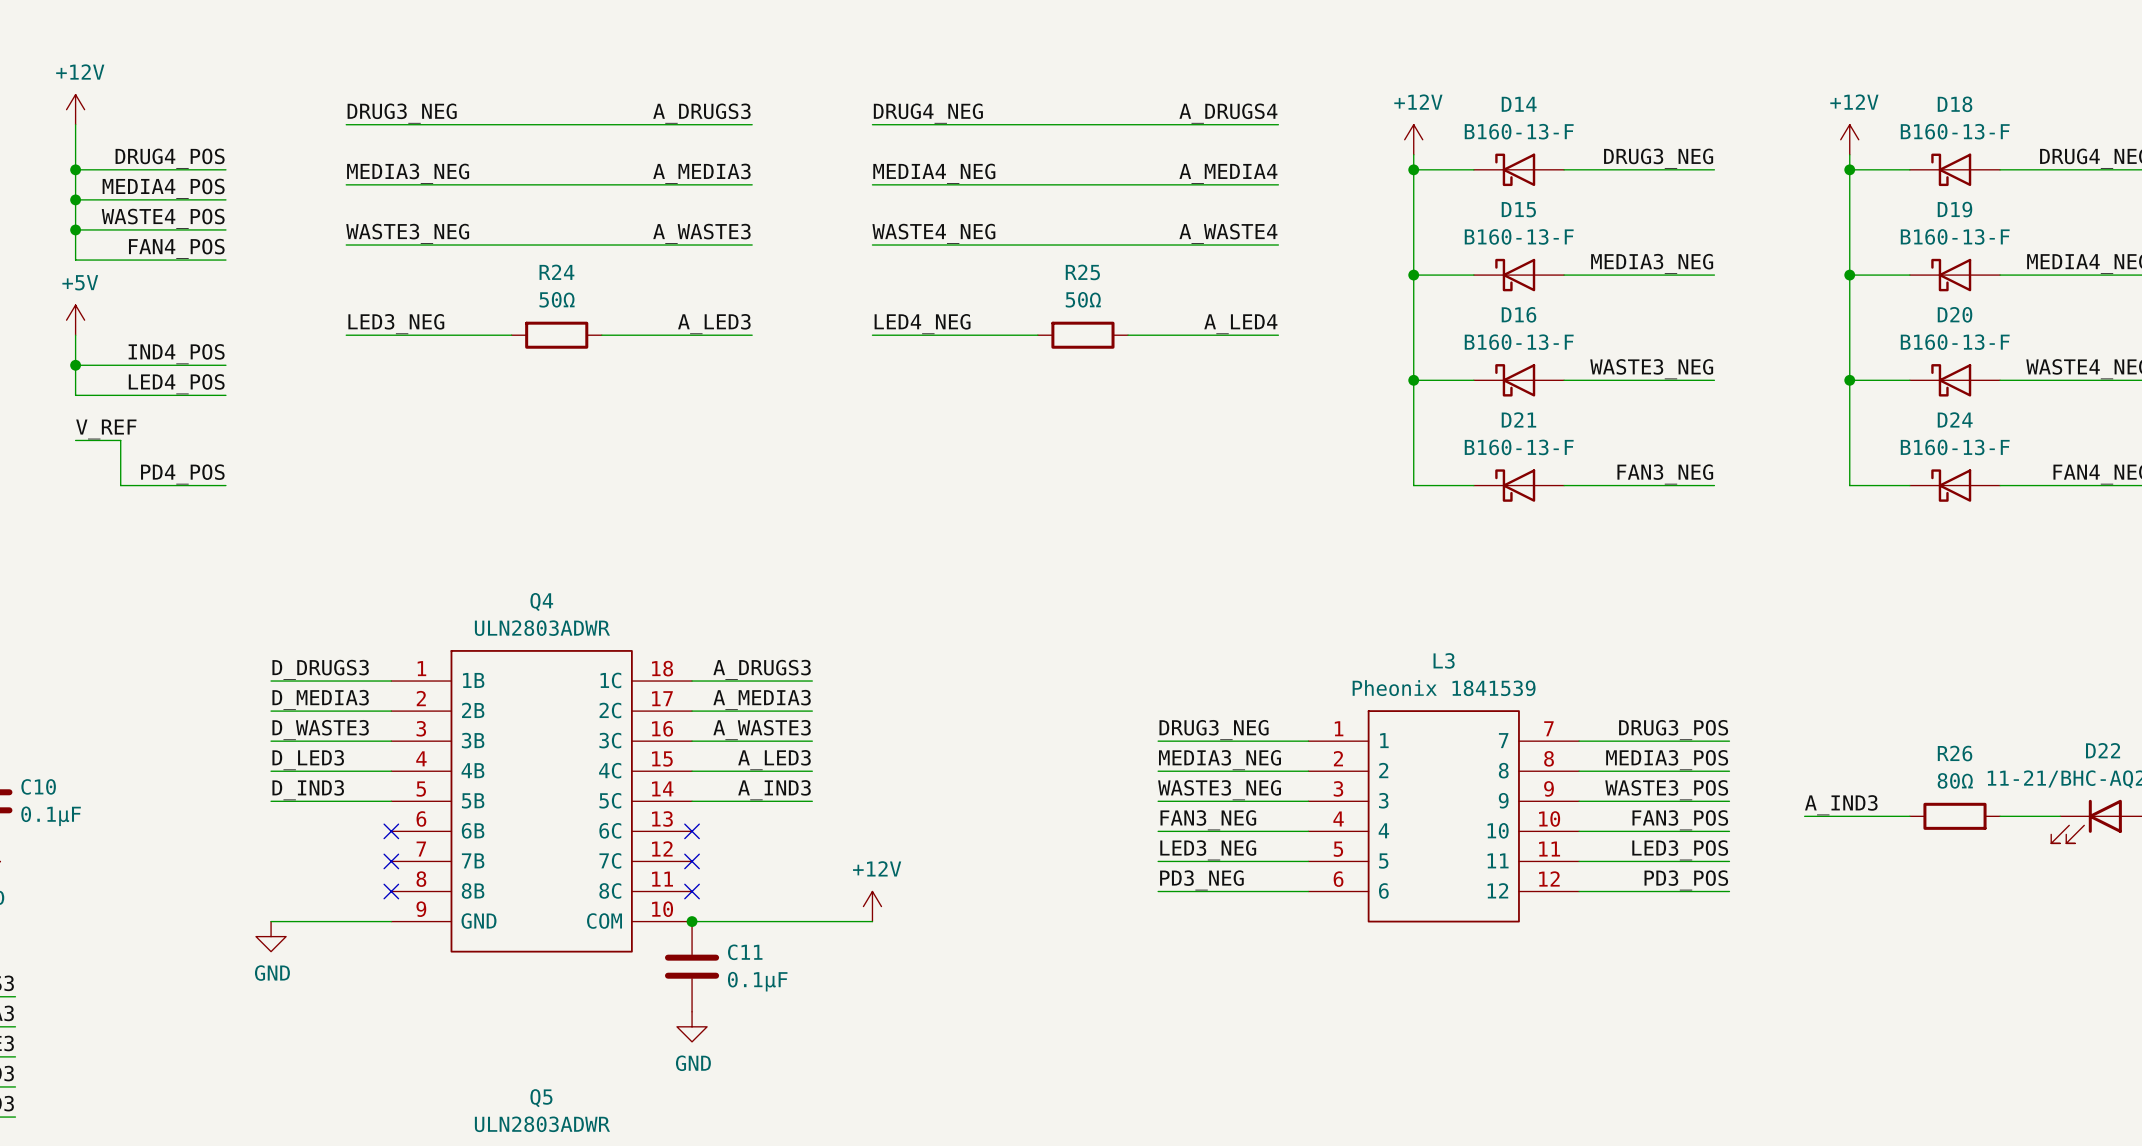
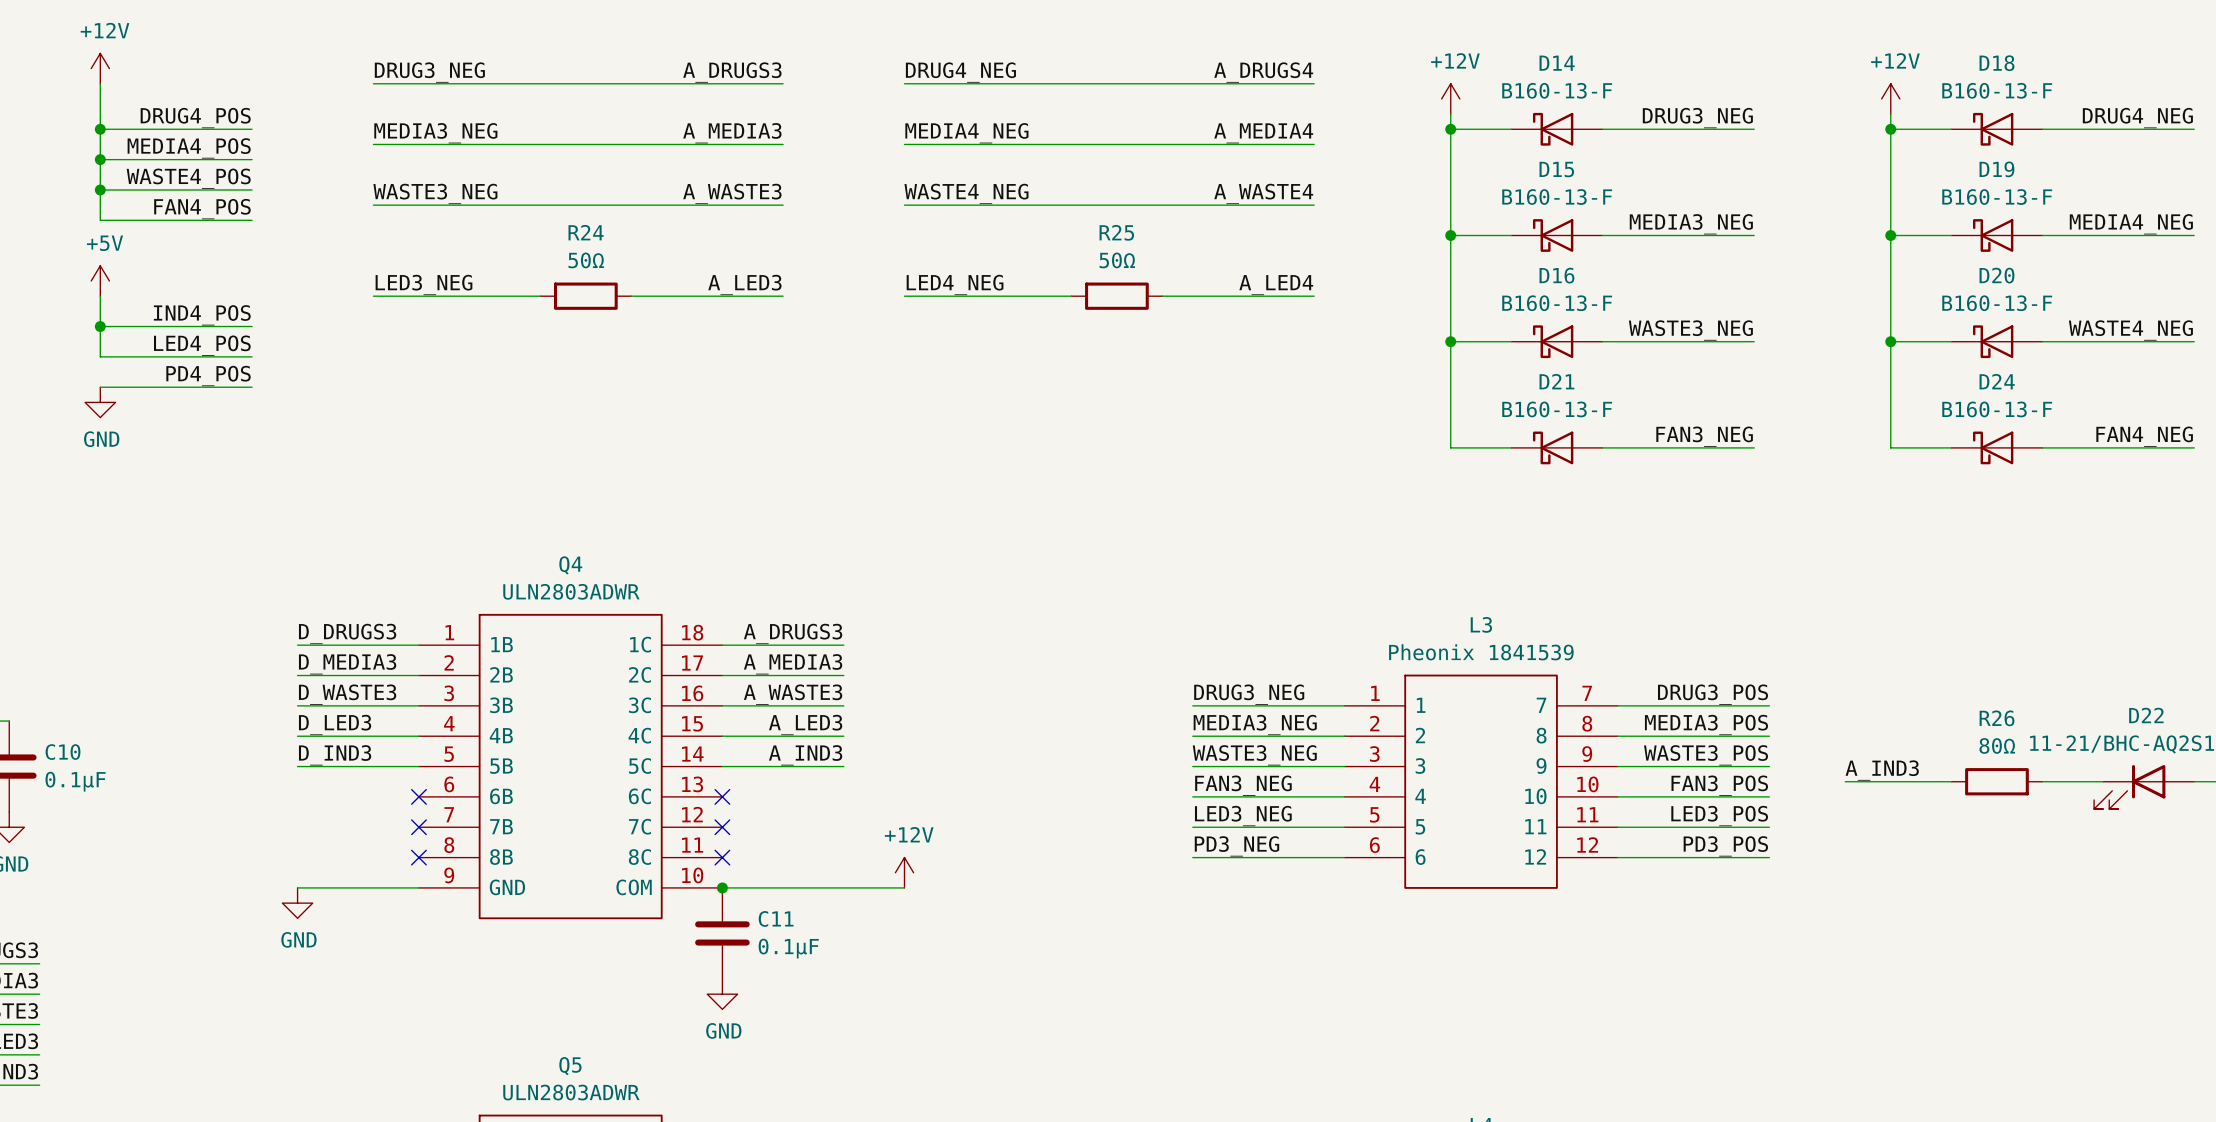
wire: none -> (100, 387) (252, 387)
label: V_REF (106, 429) -> none
wire: (75, 440) (120, 440) (120, 485) (225, 485) -> none
power symbol: none -> GND (100, 402)
label position: PD4_POS (182, 474) -> PD4_POS (208, 376)

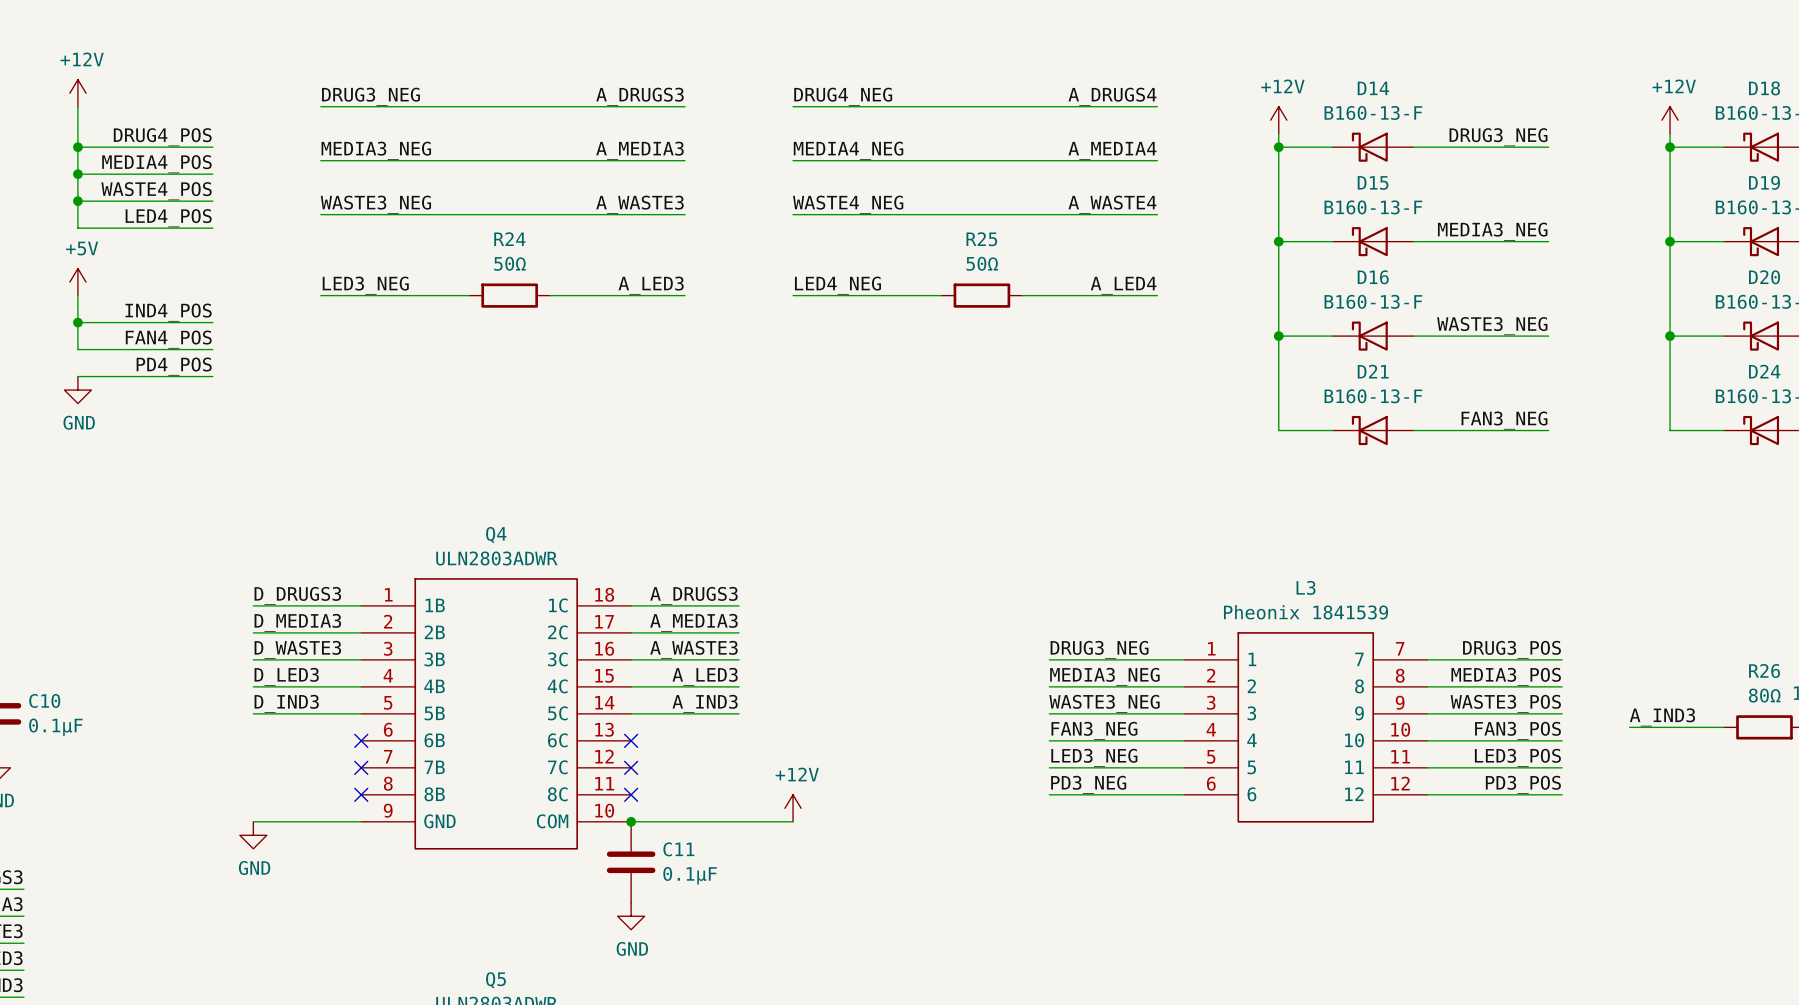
label: FAN4_POS (202, 209) -> LED4_POS (168, 218)
label: LED4_POS (202, 345) -> FAN4_POS (168, 339)

